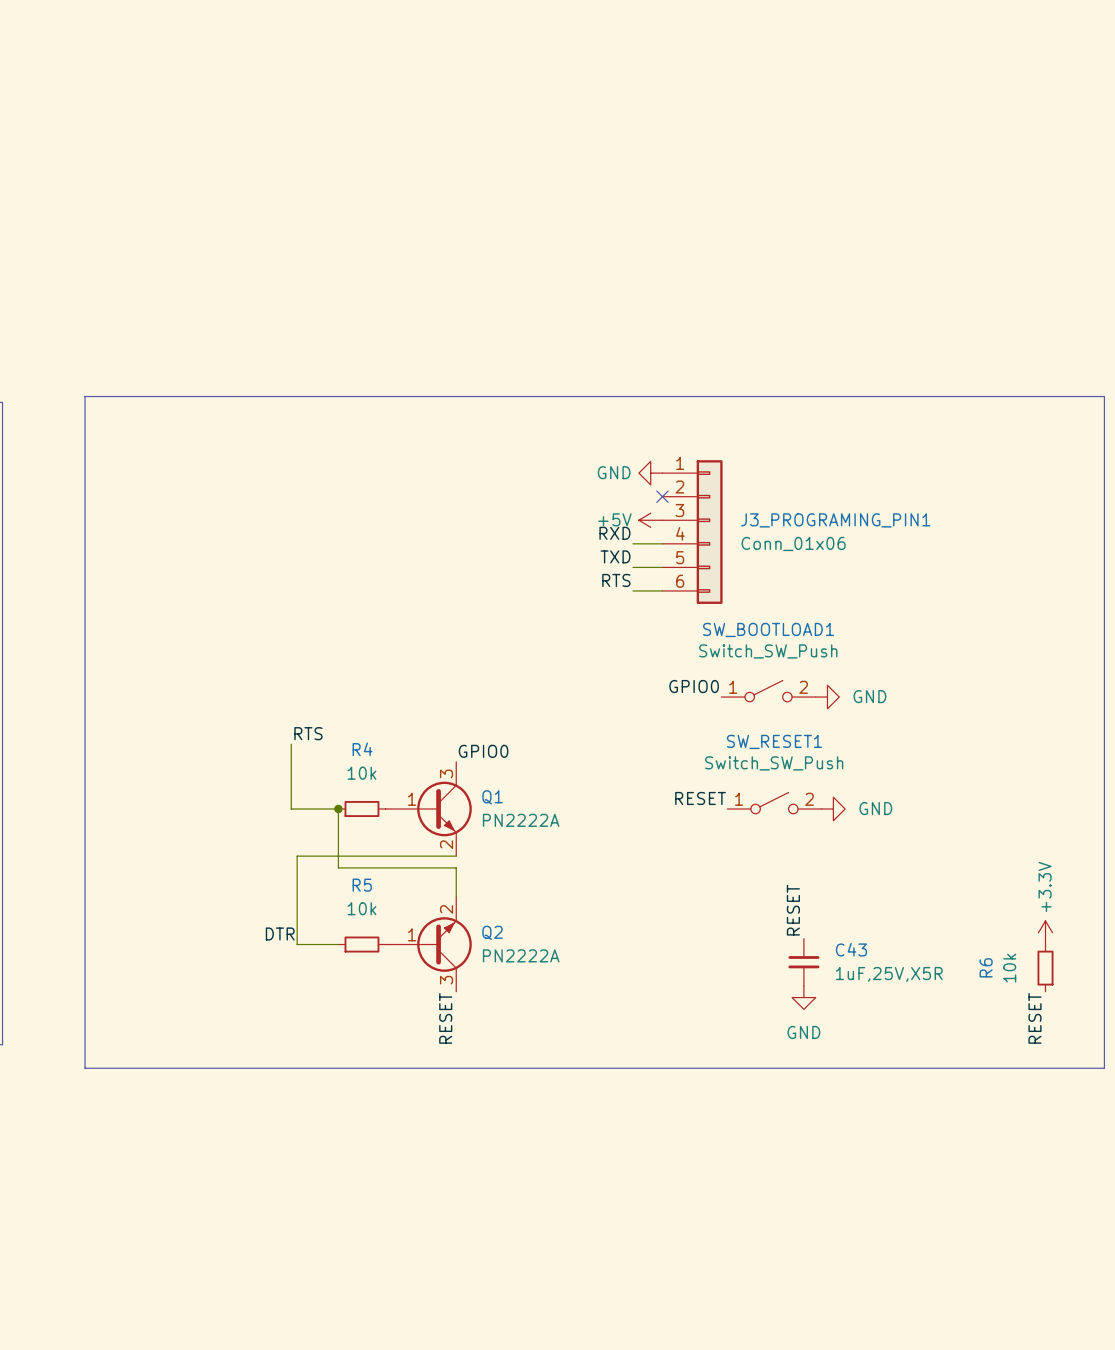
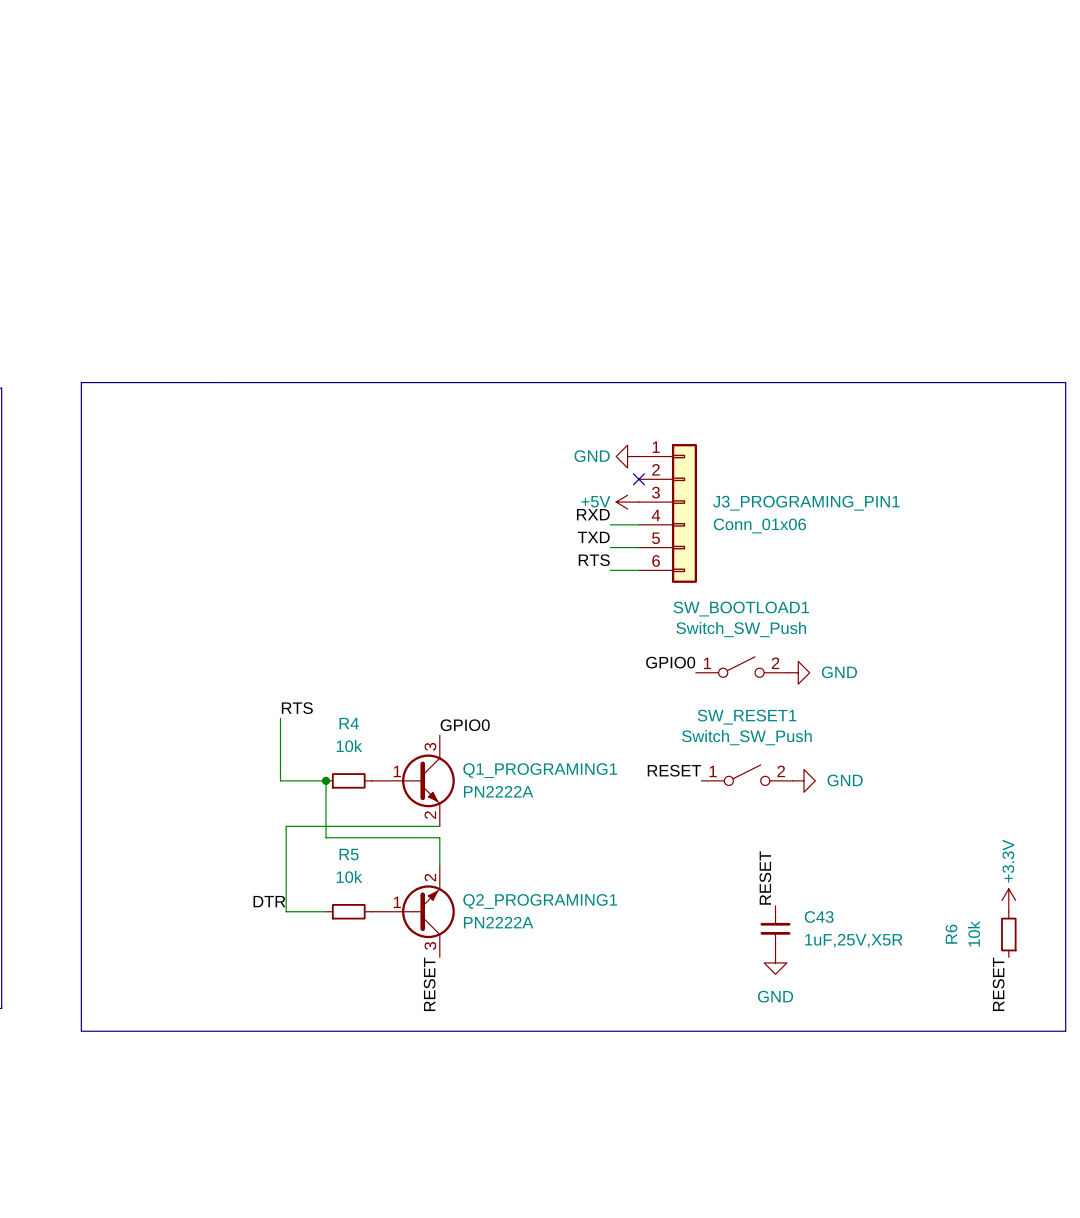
Q1 name: Q1 (492, 797) -> Q1_PROGRAMING1 (540, 770)
Q2 name: Q2 (492, 932) -> Q2_PROGRAMING1 (540, 901)

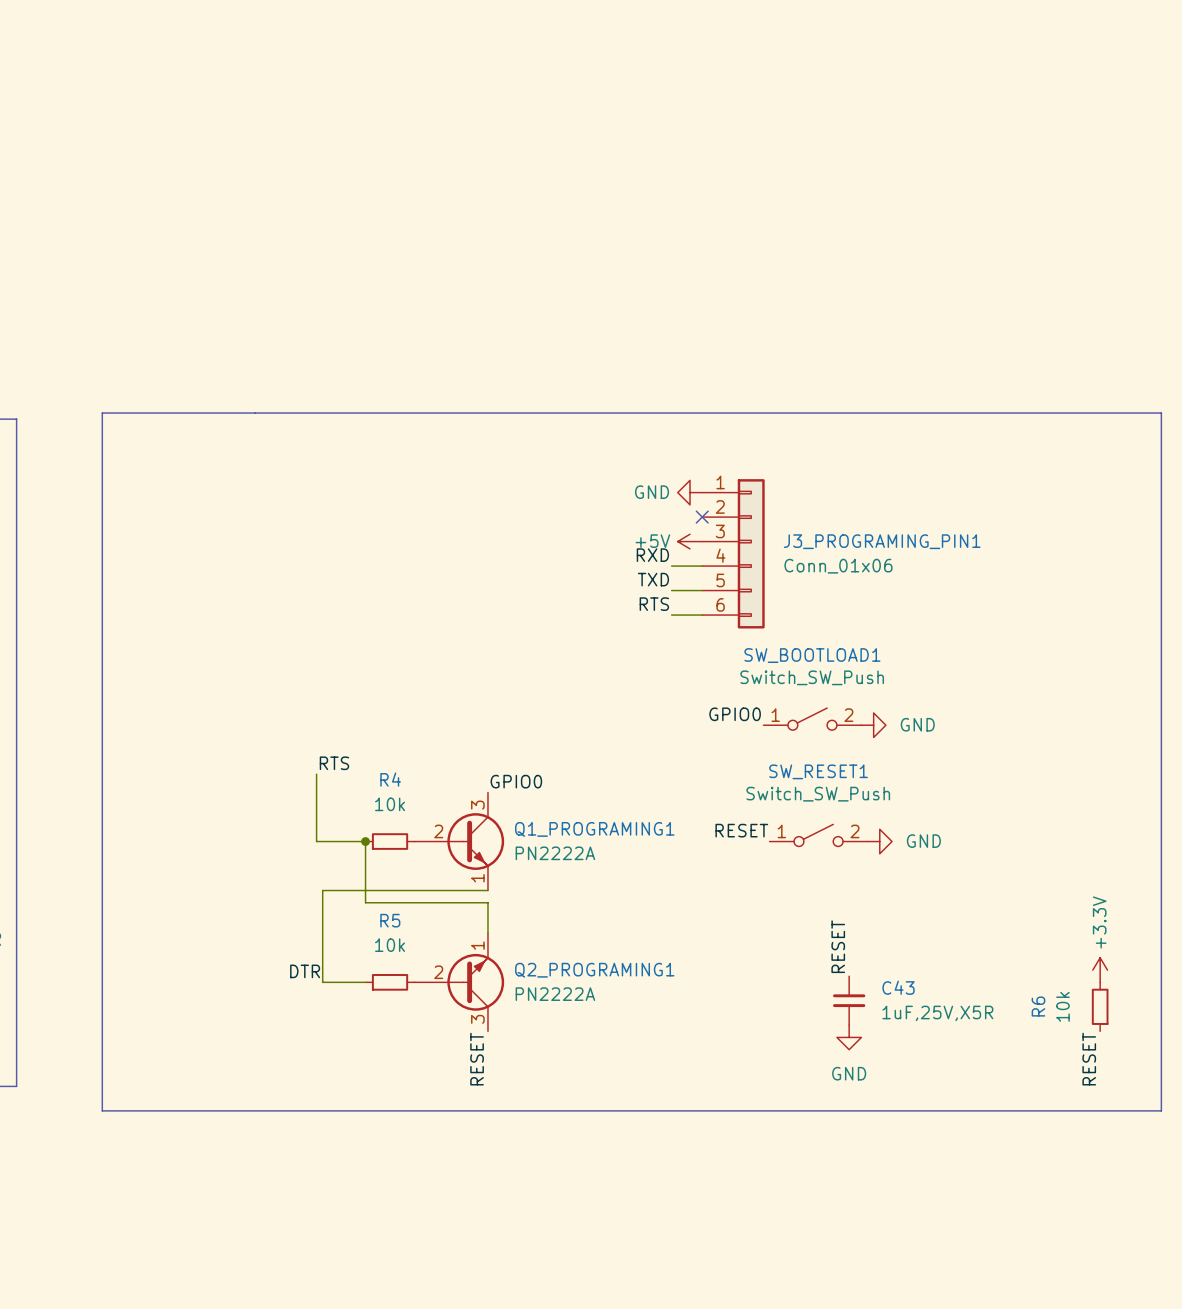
Q1_PROGRAMING1 symbol: [371, 735, 455, 827] -> [414, 792, 505, 891]
Q2_PROGRAMING1 symbol: [371, 866, 455, 958] -> [414, 933, 505, 1032]

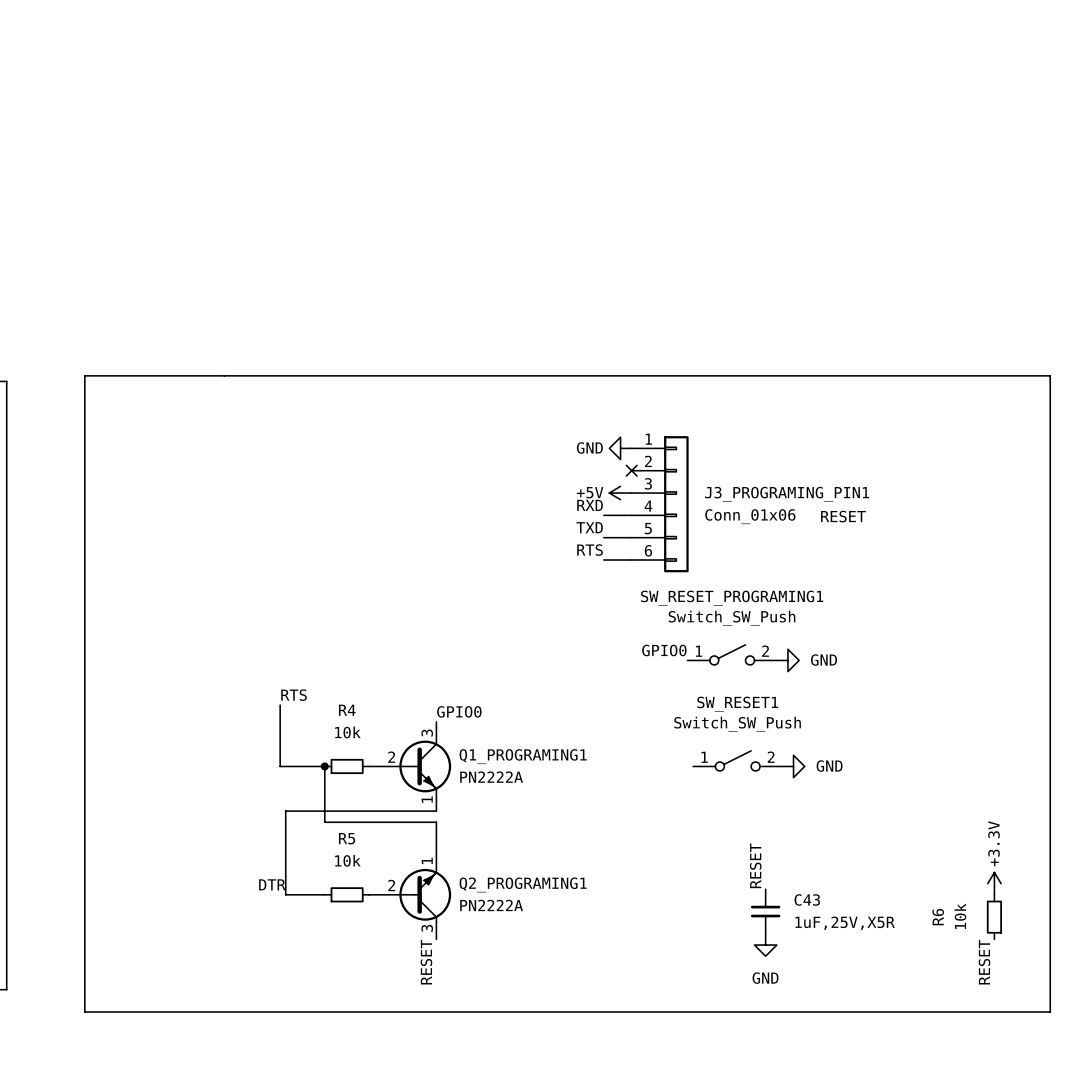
label: none -> RESET (843, 516)
SW_BOOTLOAD1 name: SW_BOOTLOAD1 (812, 655) -> SW_RESET_PROGRAMING1 (732, 598)
label: RESET (741, 830) -> none

